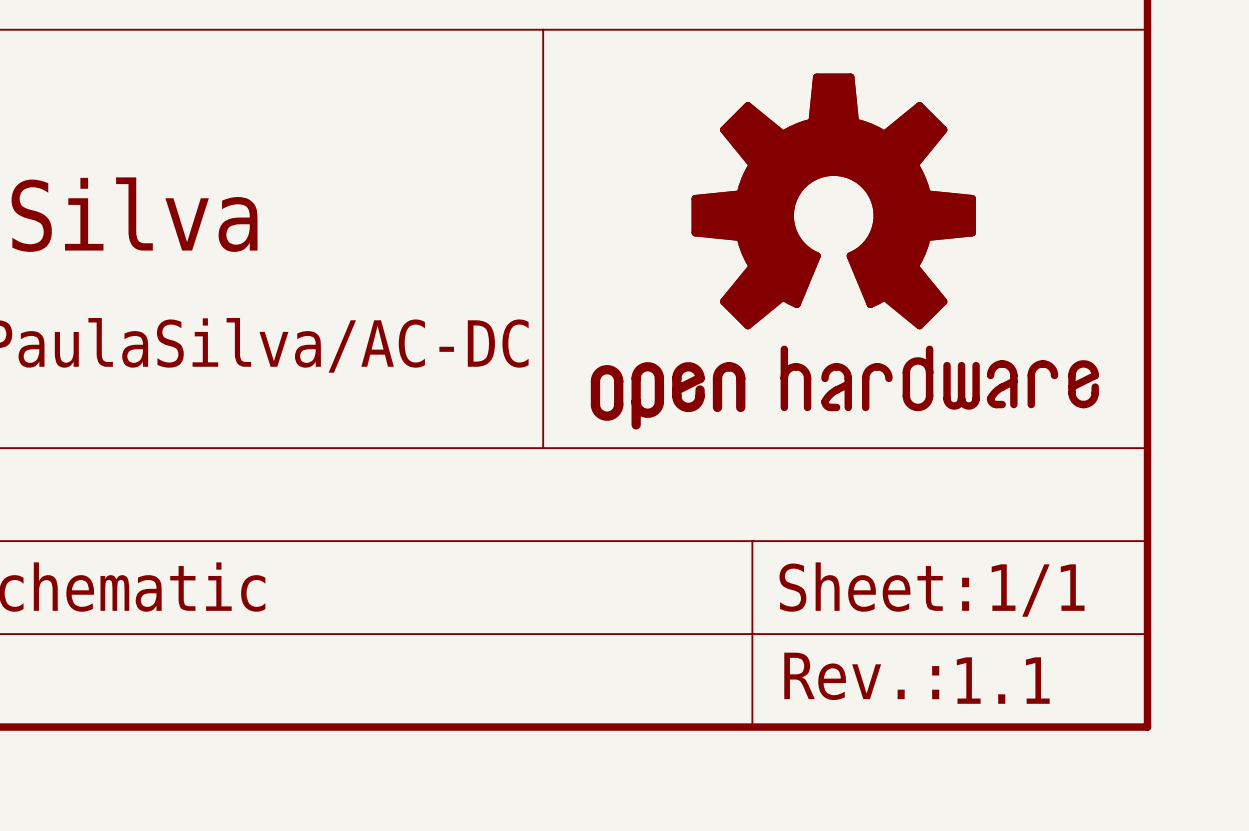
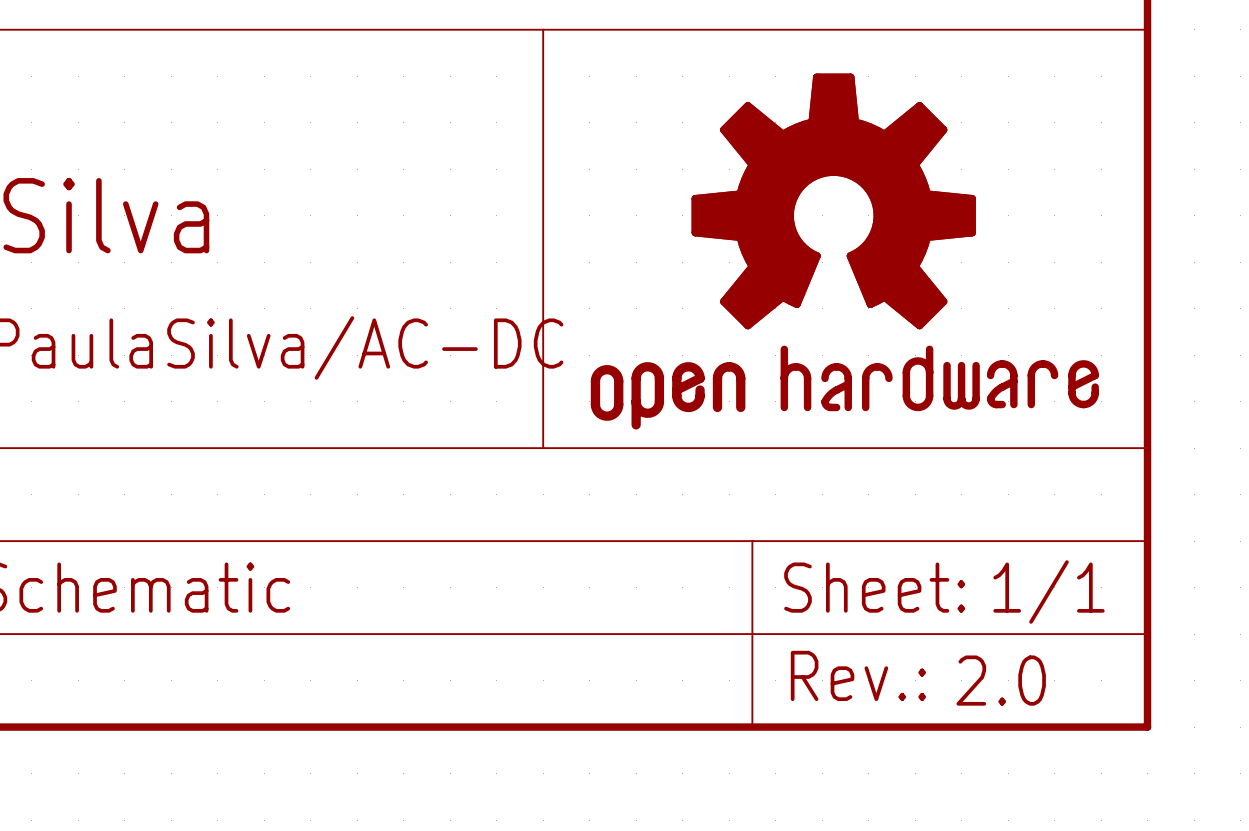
text: 1.1 (1003, 680) -> 2.0 (1001, 680)

